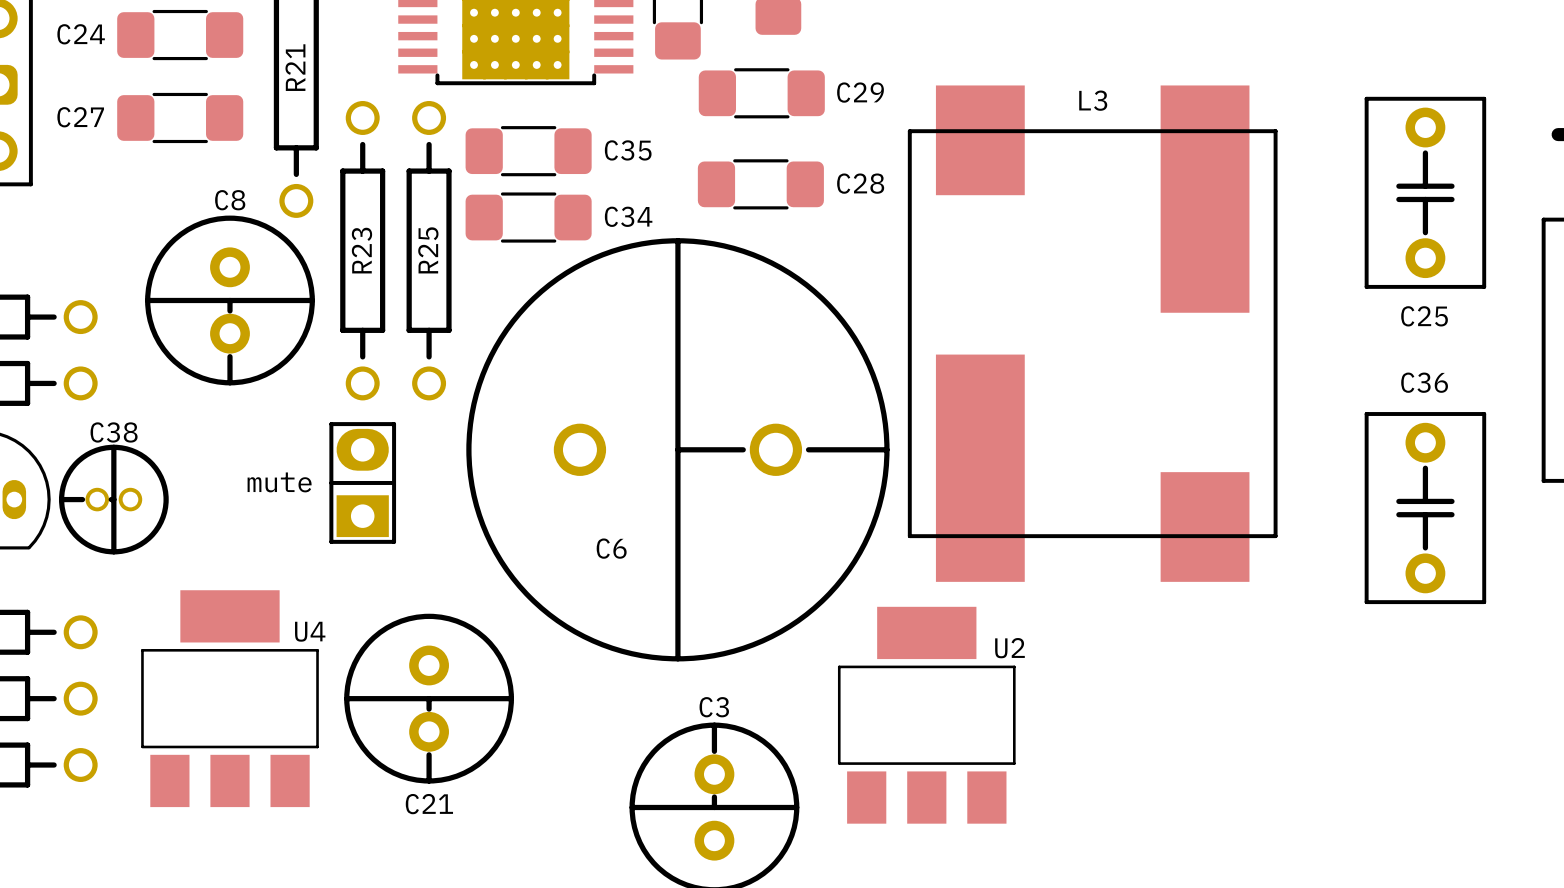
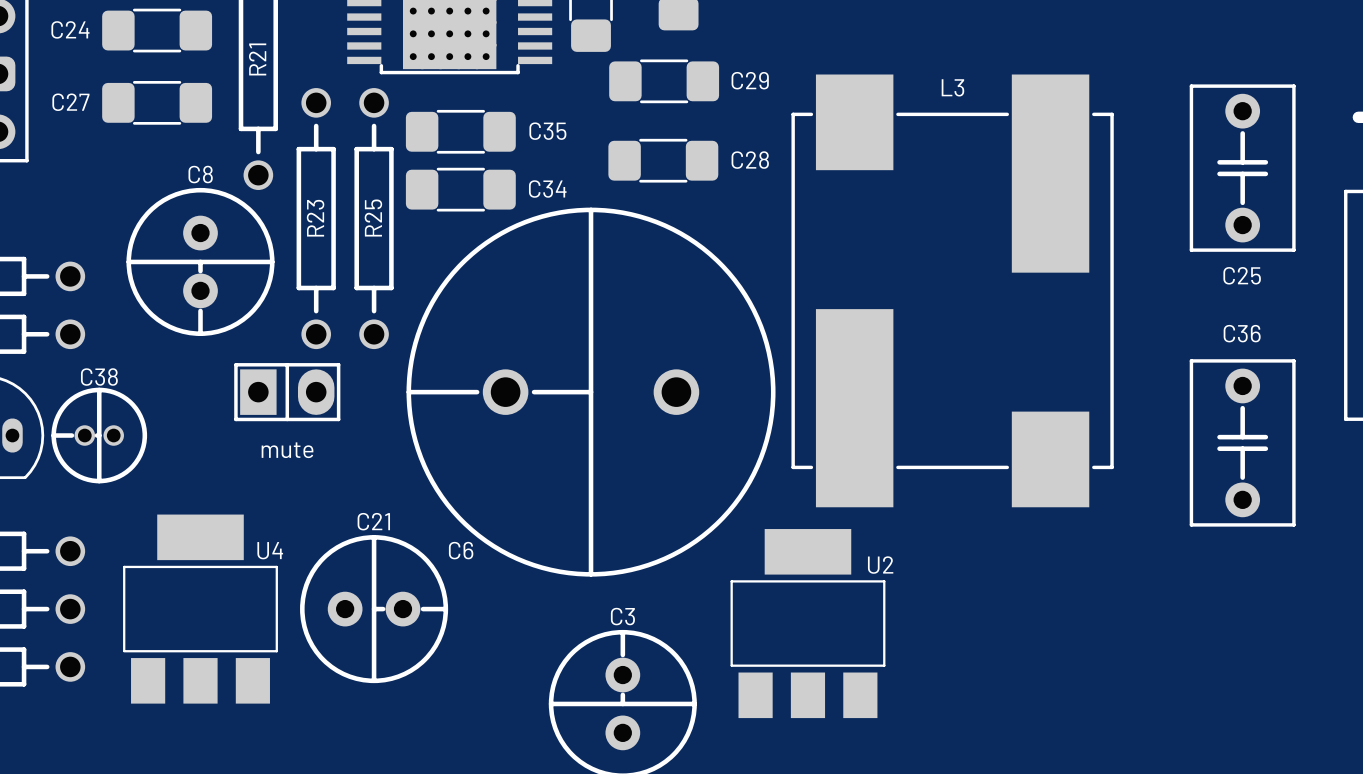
L3 footprint: [907, 85, 1278, 582] -> [791, 74, 1114, 508]
C6 rotation: 0° (677, 449) -> 180° (591, 392)
part value position: mute (279, 482) -> mute (287, 450)
part rotation: 0° (362, 482) -> 90° clockwise (287, 392)
C6 name position: C6 (611, 548) -> C6 (461, 550)
C21 rotation: 0° (429, 698) -> 90° counterclockwise (374, 609)
C21 name position: C21 (429, 804) -> C21 (373, 521)

